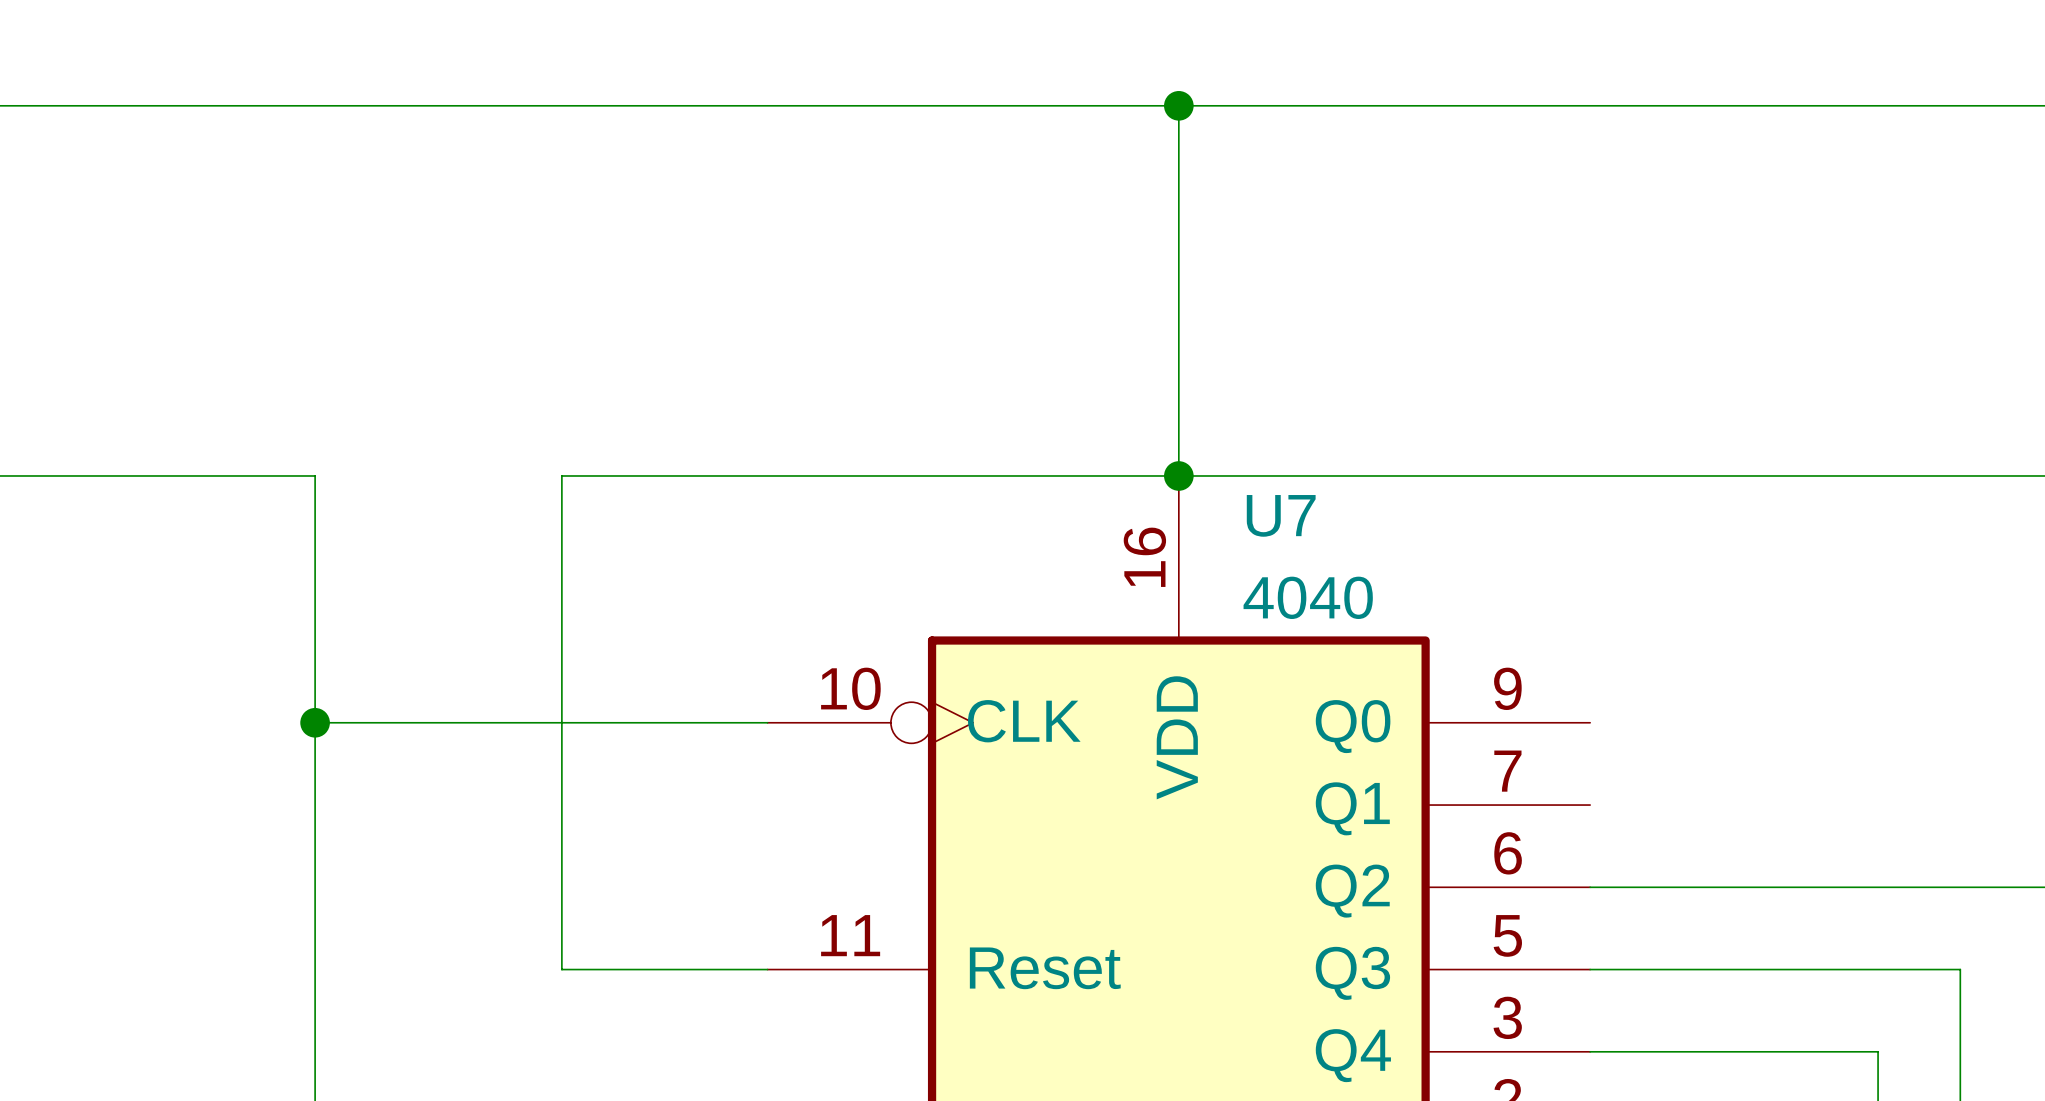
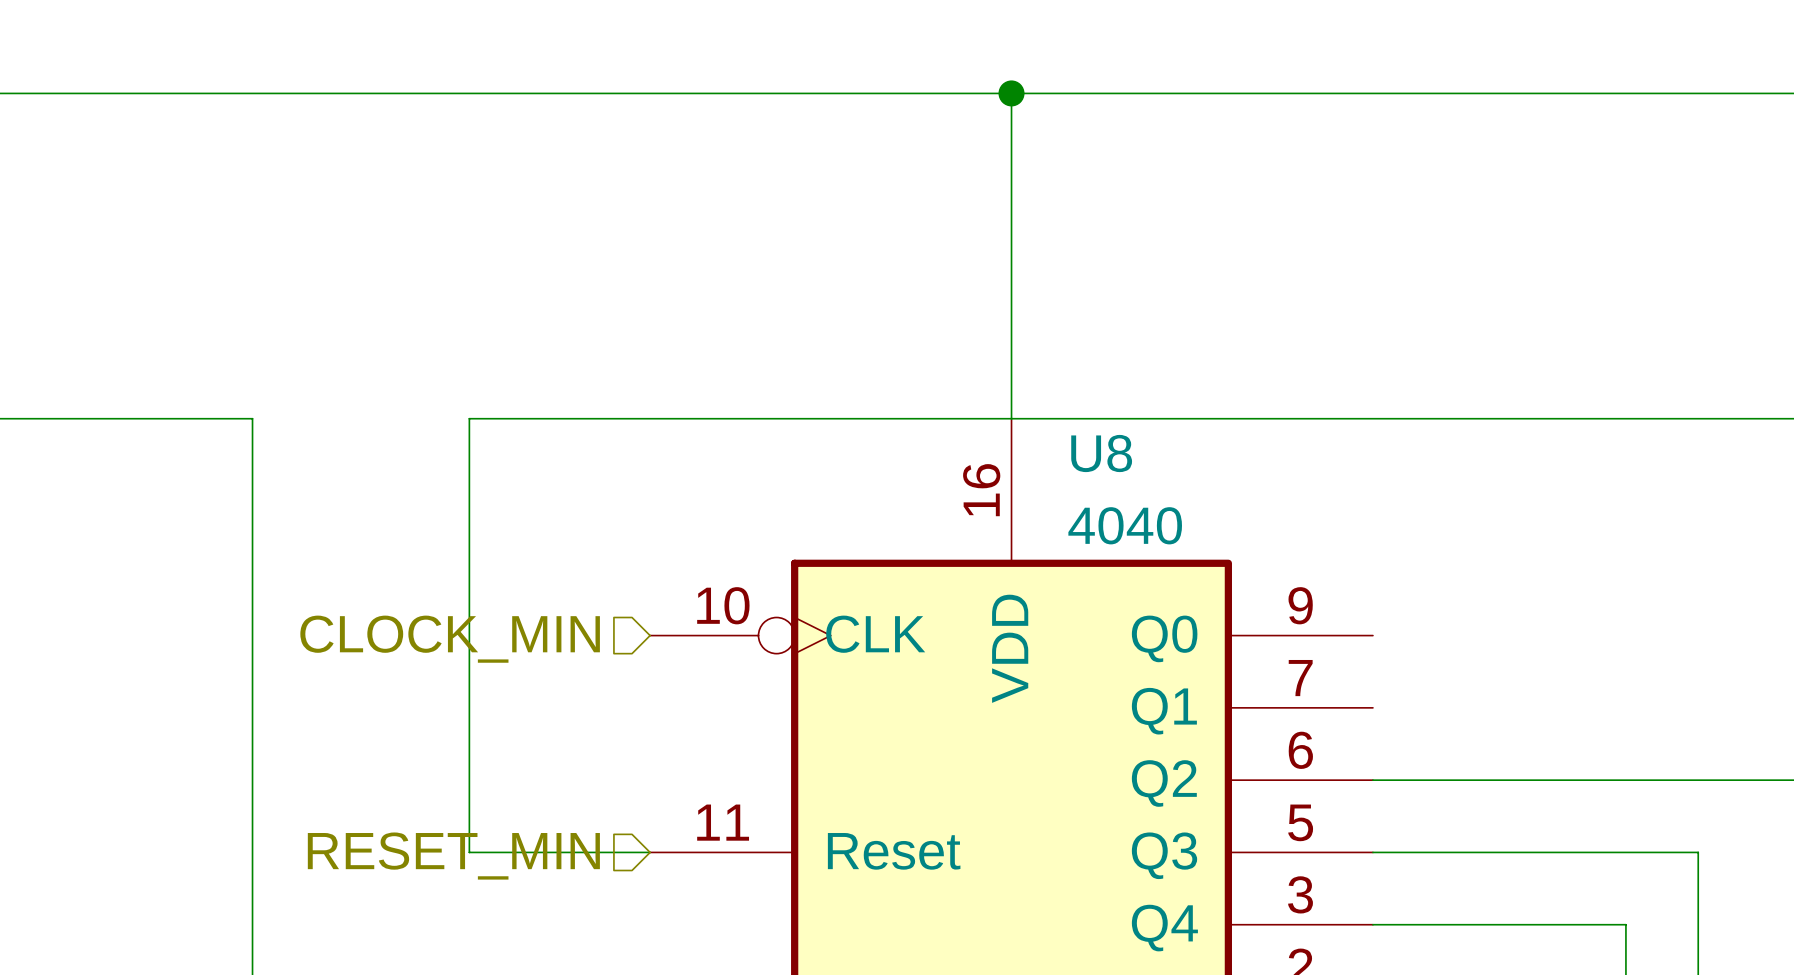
junction: (1178, 475) -> none
U7 name: U7 (1281, 515) -> U8 (1101, 453)
wire: (315, 722) (767, 722) -> none
junction: (315, 722) -> none
hierarchical label: none -> CLOCK_MIN (450, 639)
hierarchical label: none -> RESET_MIN (453, 856)

